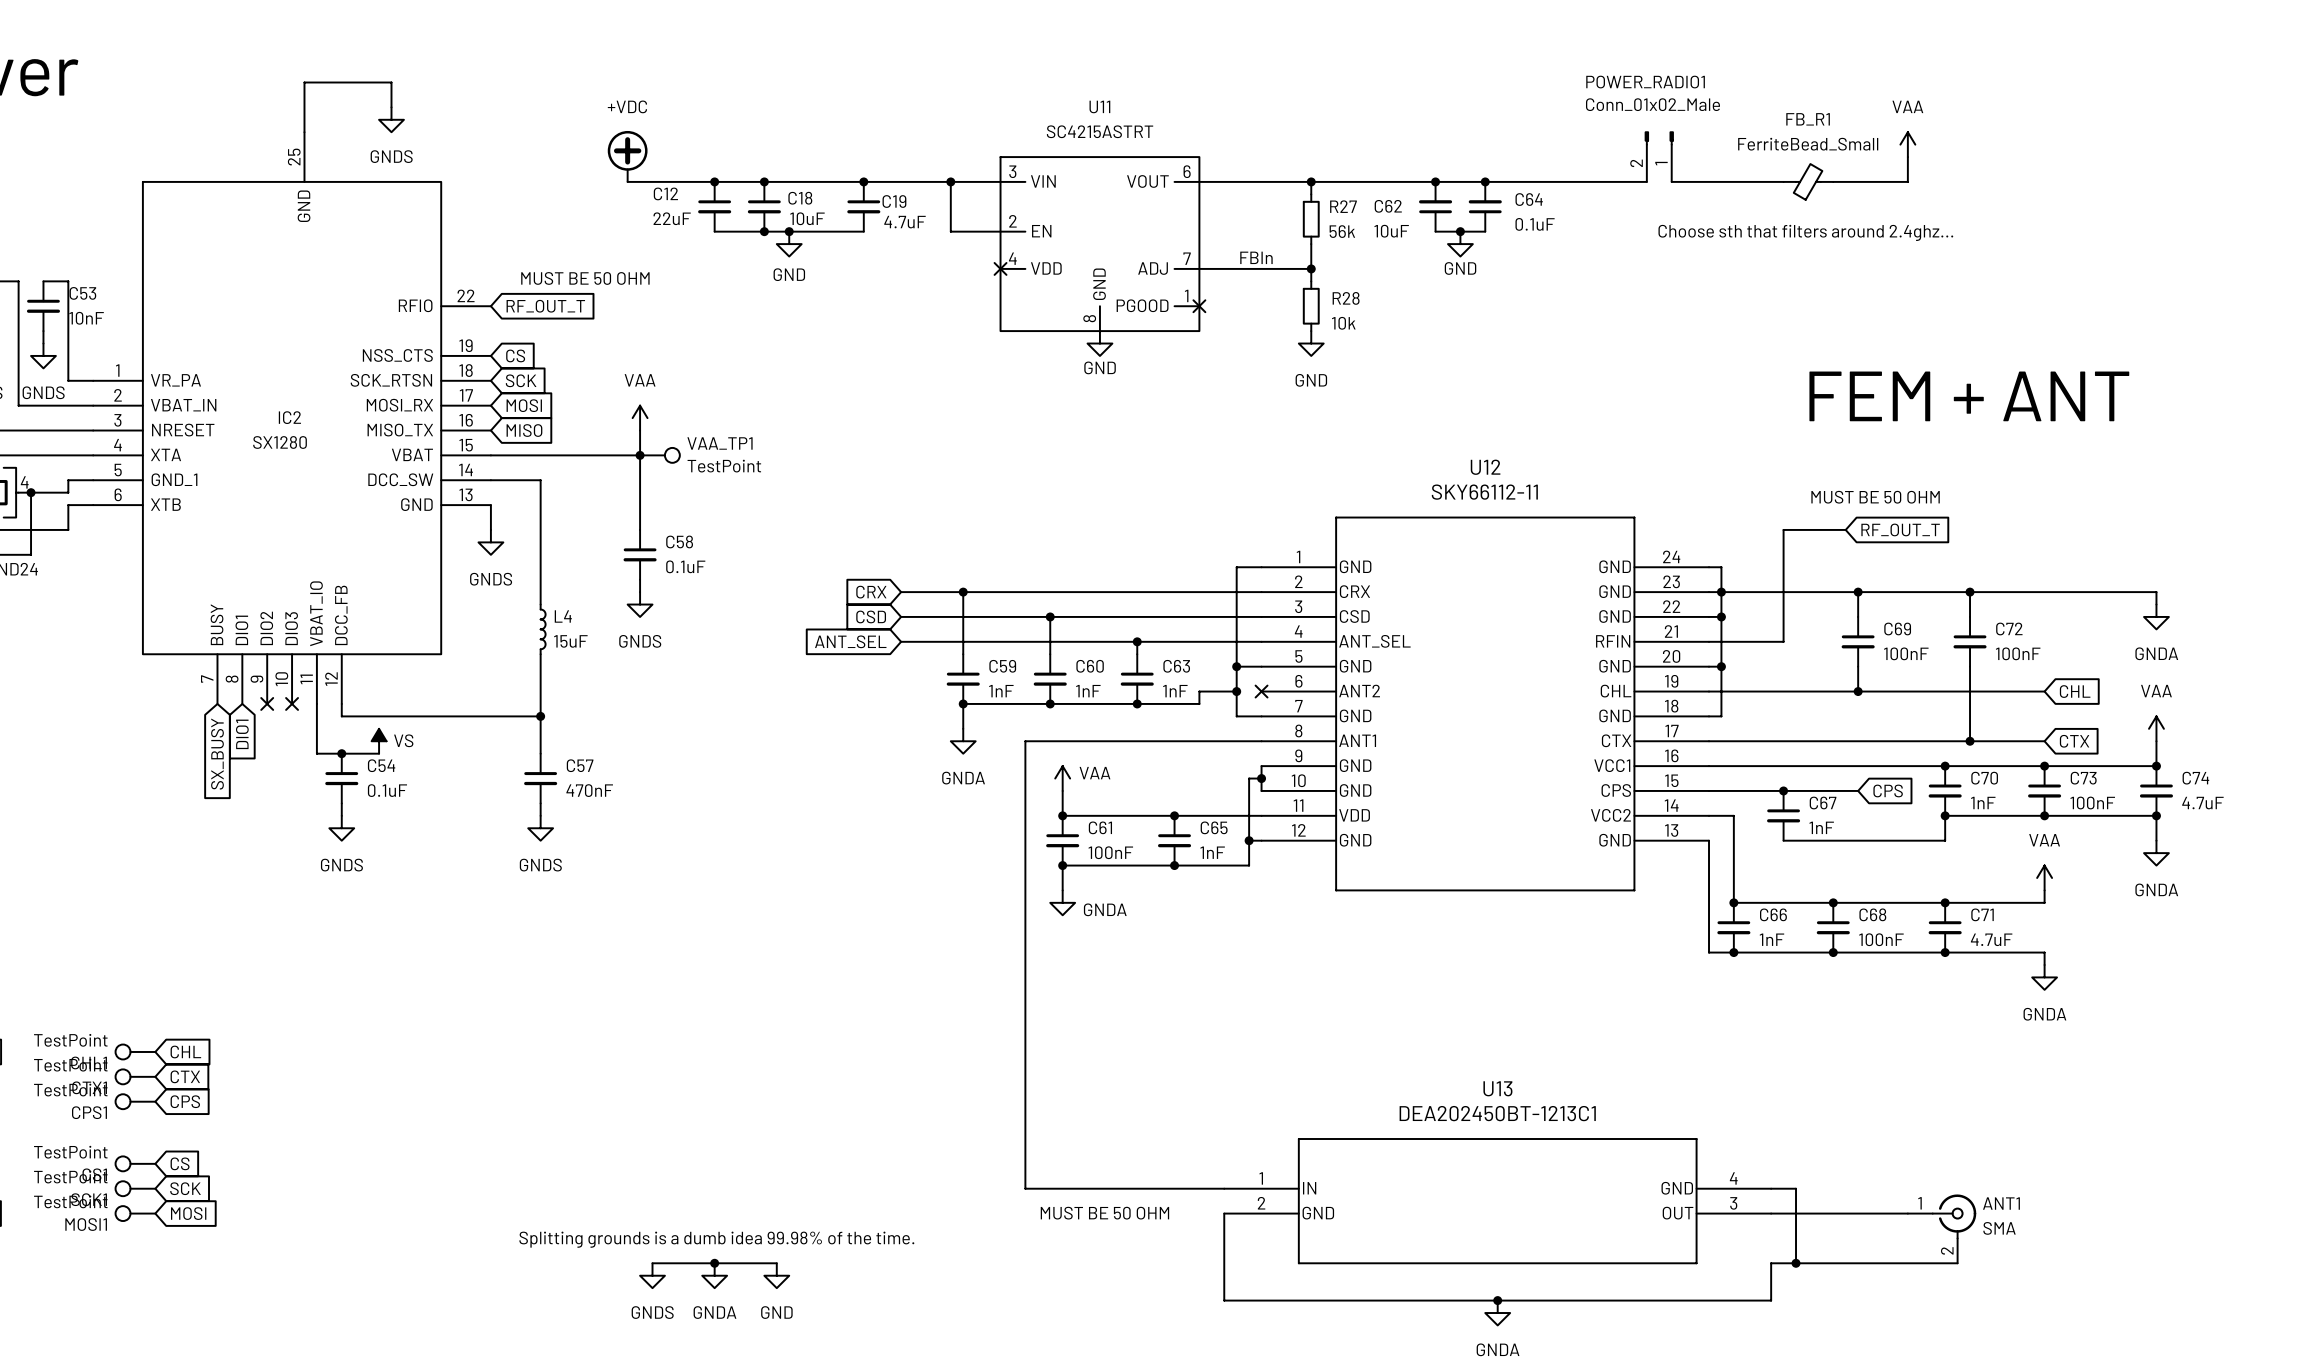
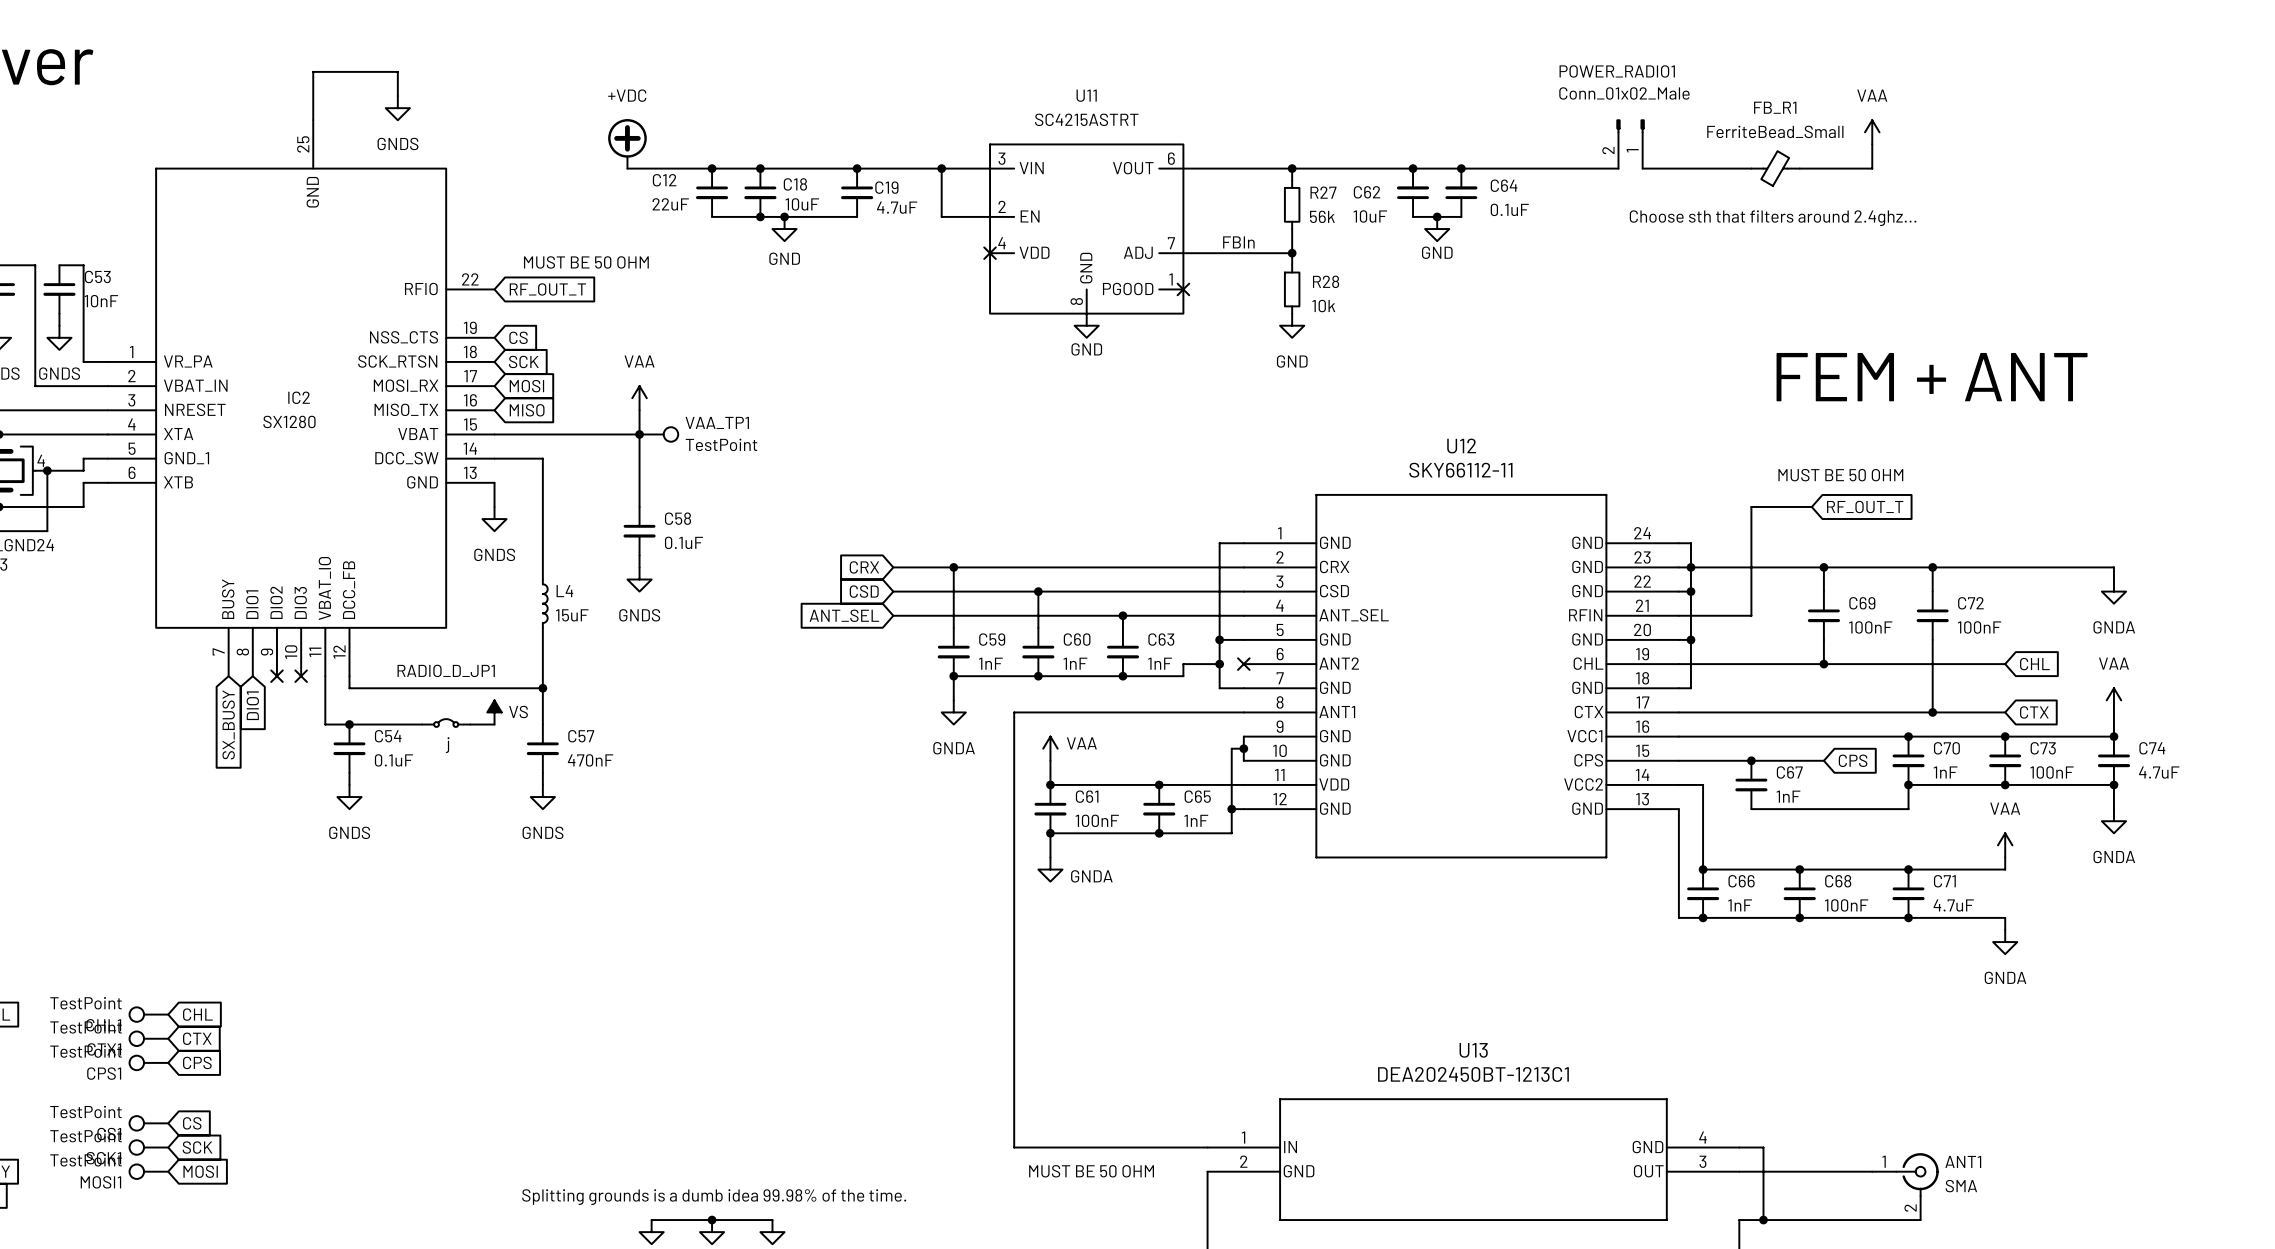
power symbol position: VS (379, 741) -> VS (494, 712)
RADIO_D_JP1: none -> j (446, 723)
wire: none -> (385, 724) (422, 724)
wire: none -> (470, 724) (494, 724)

